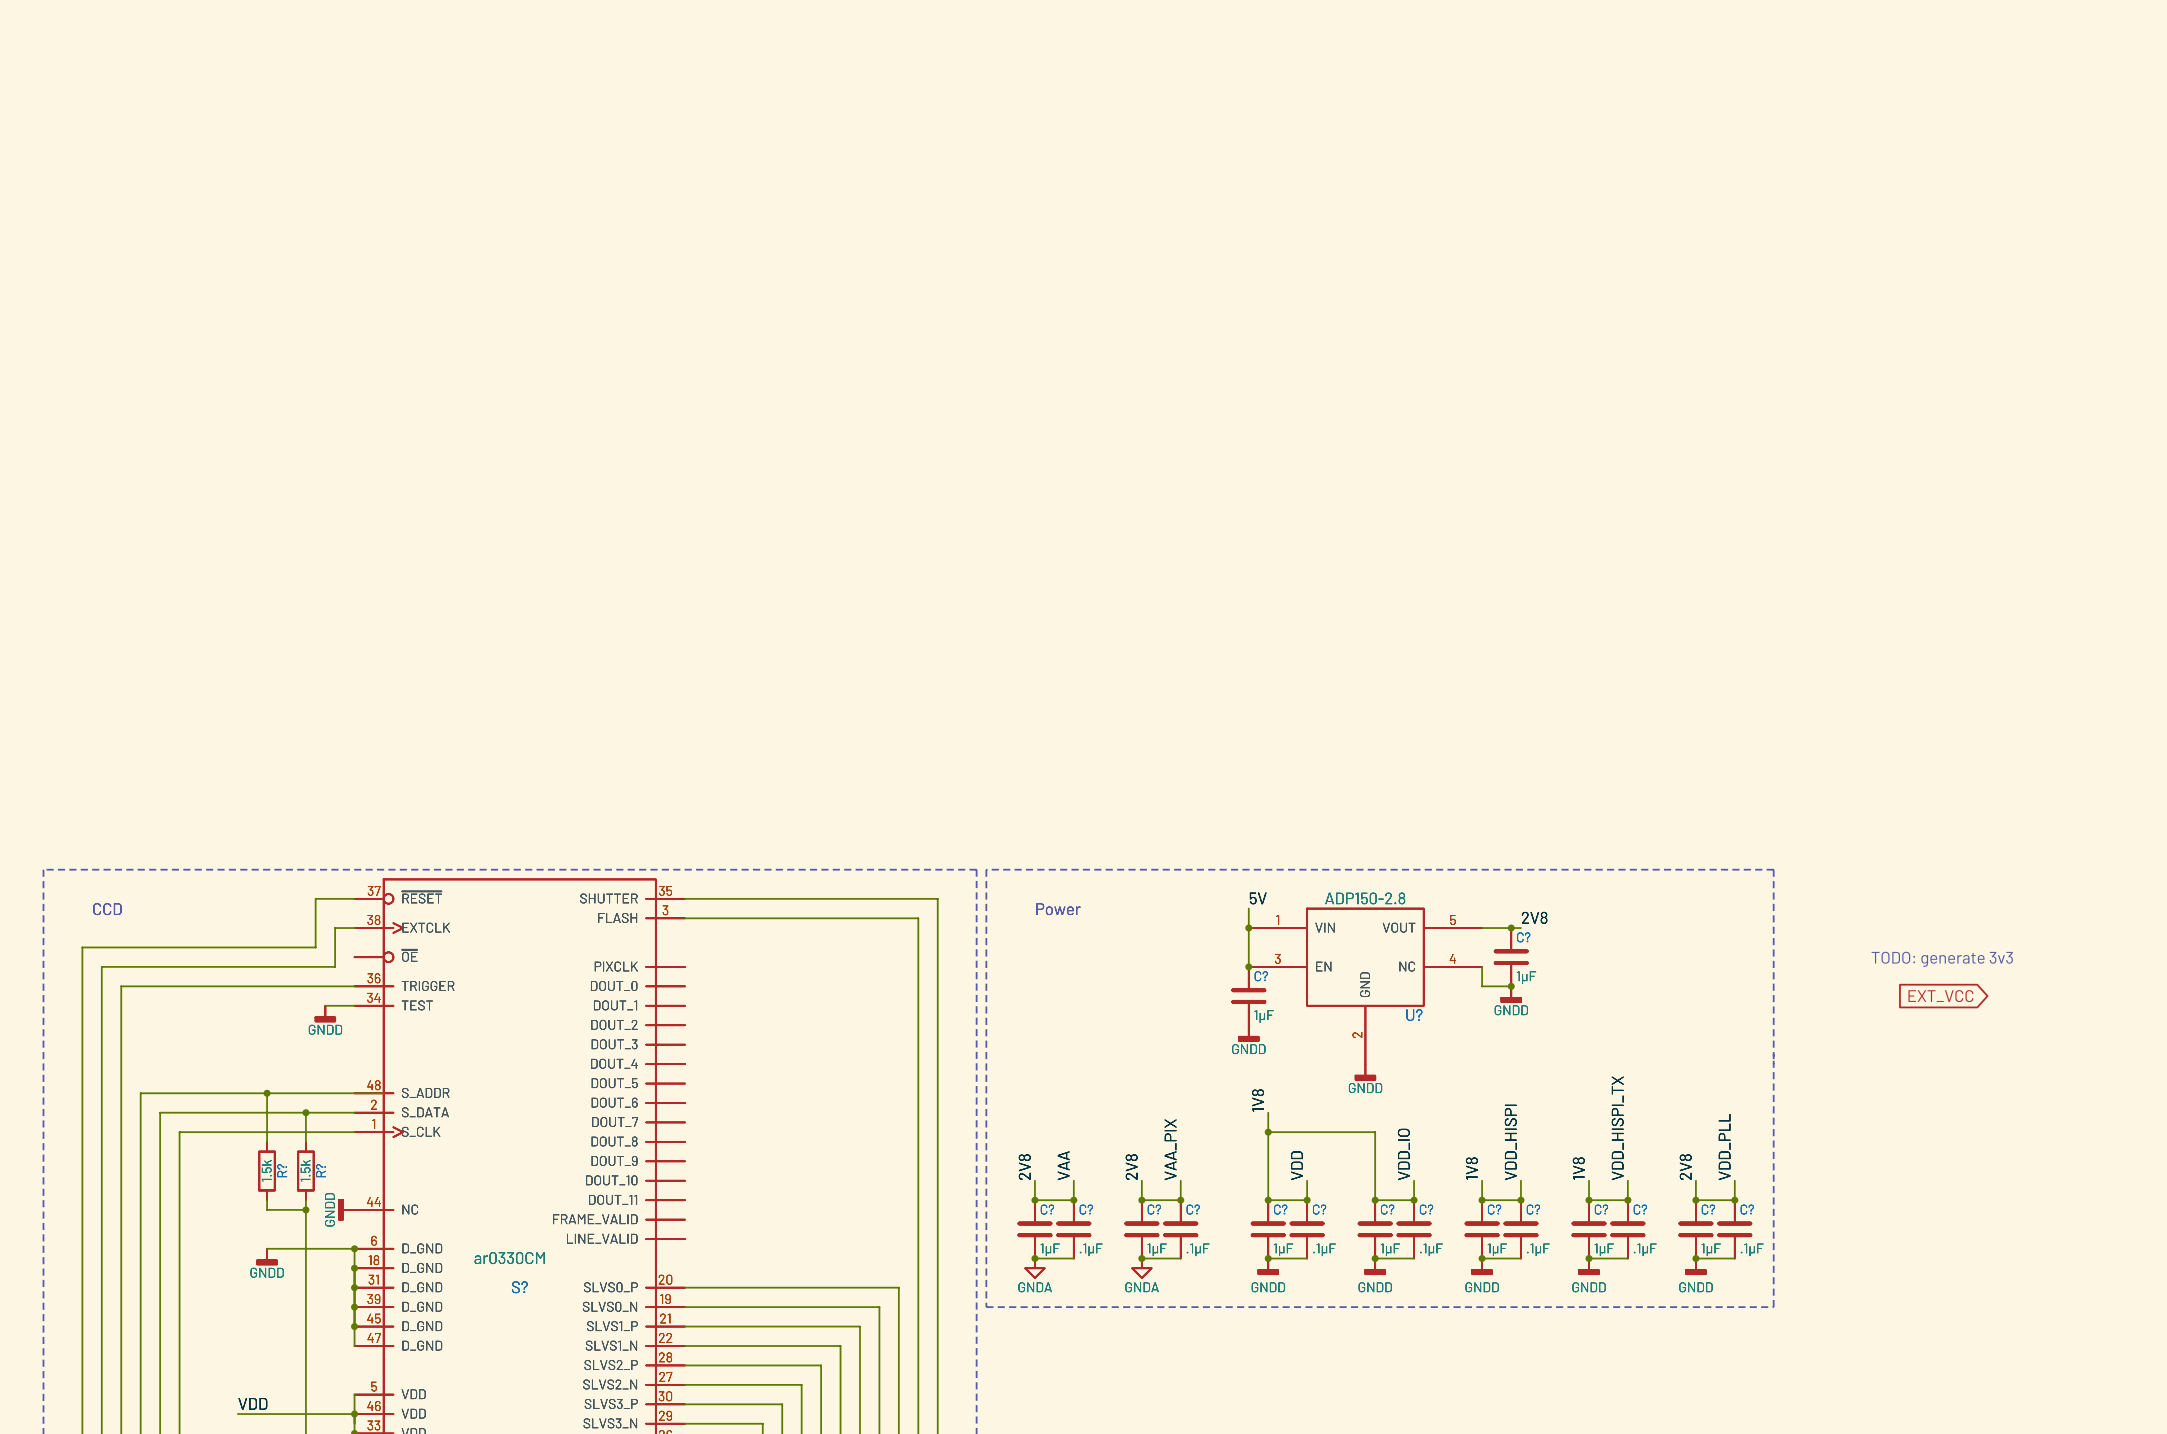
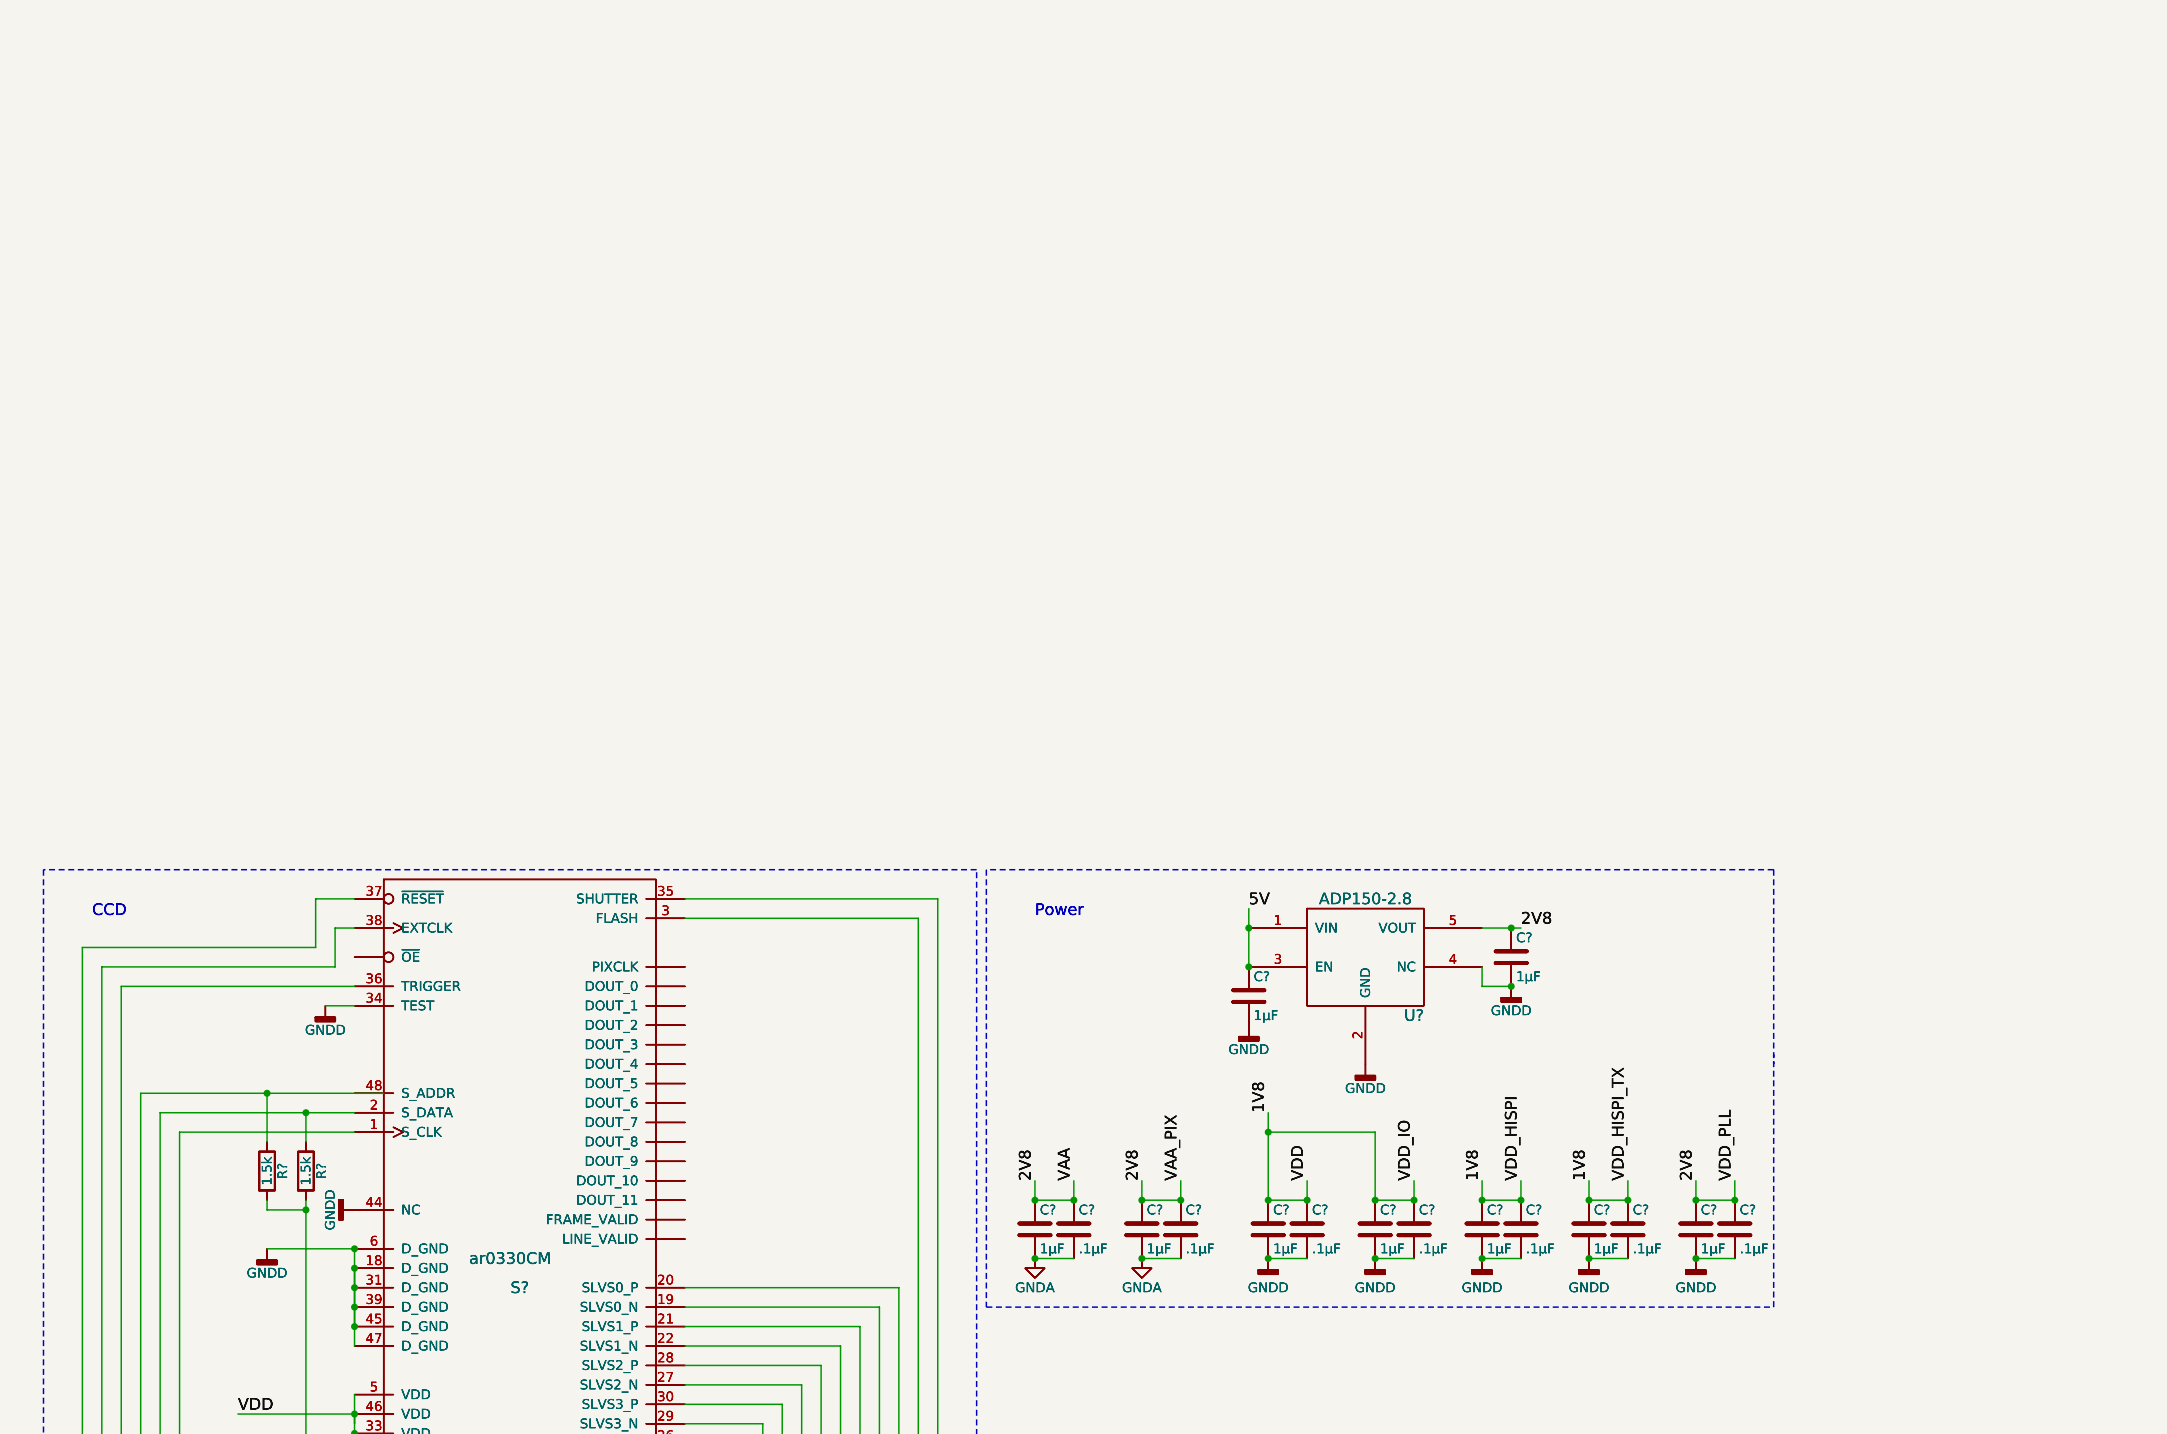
text: TODO: generate 3v3 (1942, 959) -> none
global label: EXT_VCC (1940, 996) -> none

